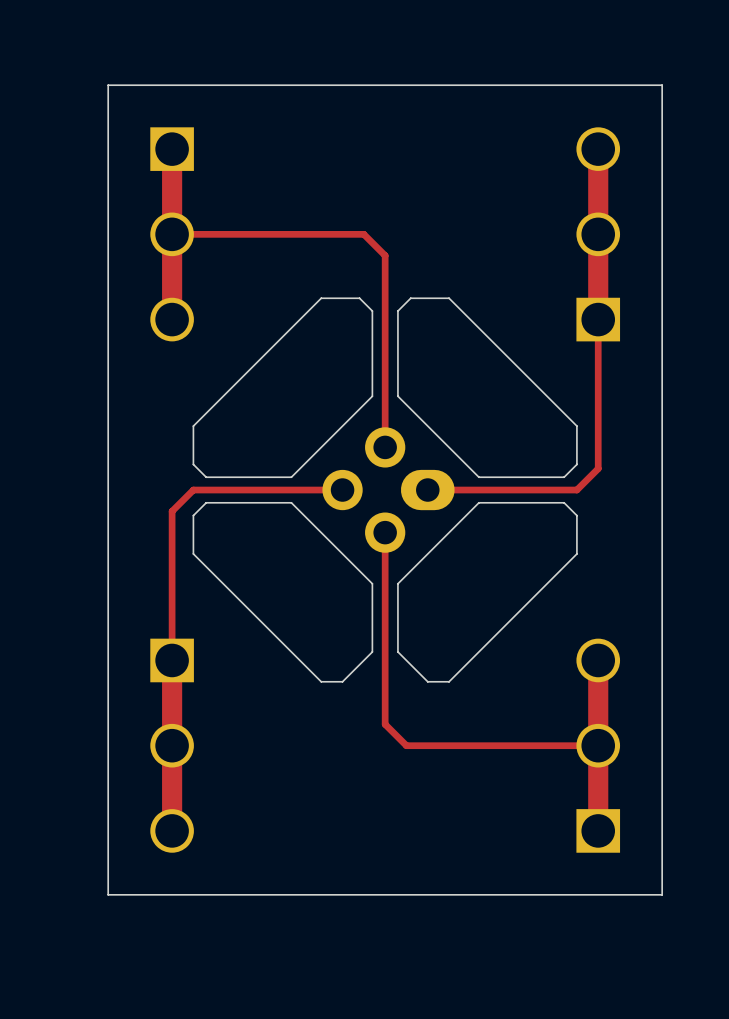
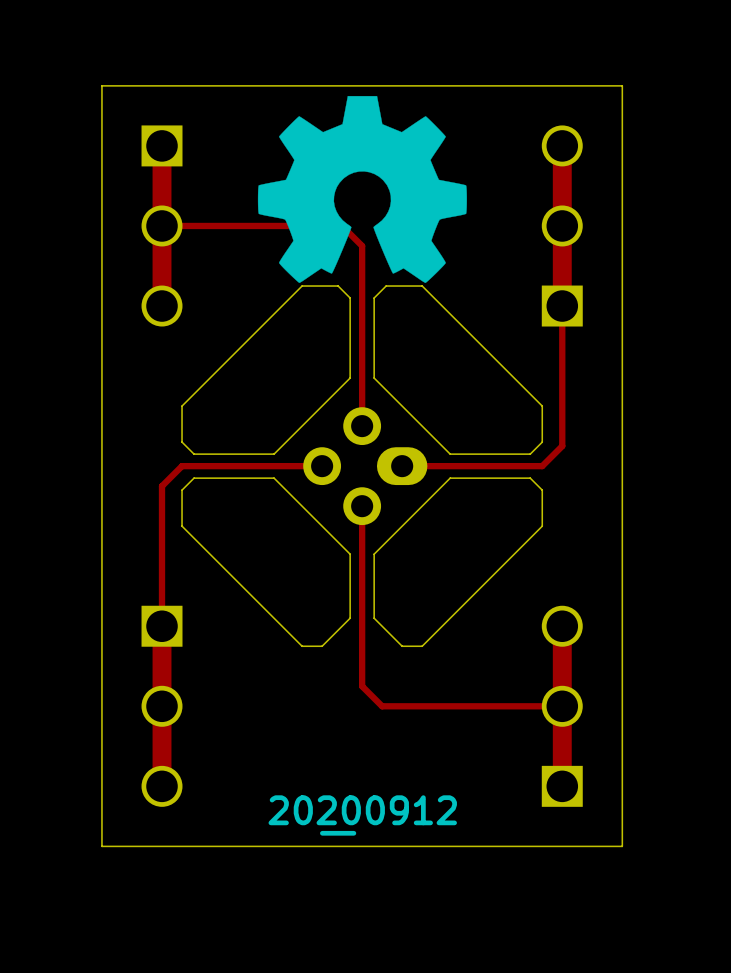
drawing: none -> [257, 96, 467, 284]
drawing: none -> [320, 830, 357, 836]

